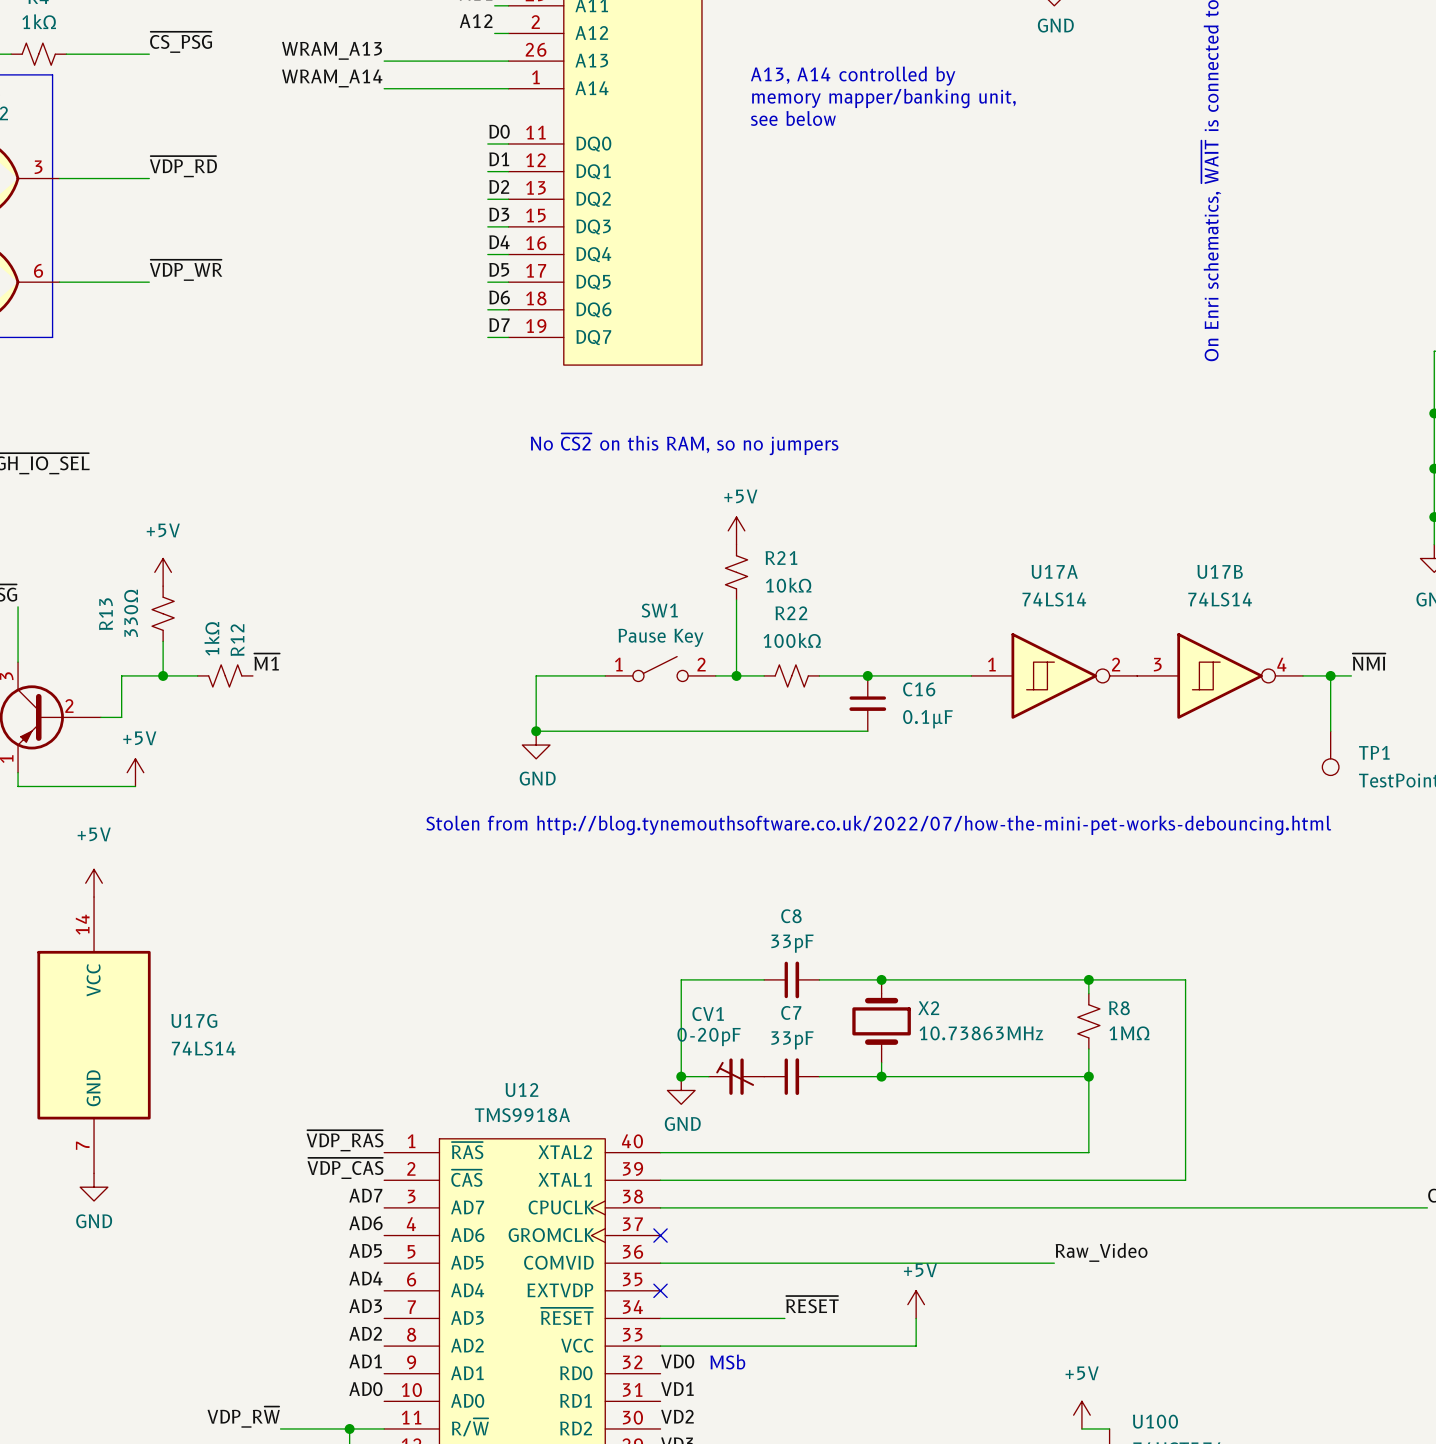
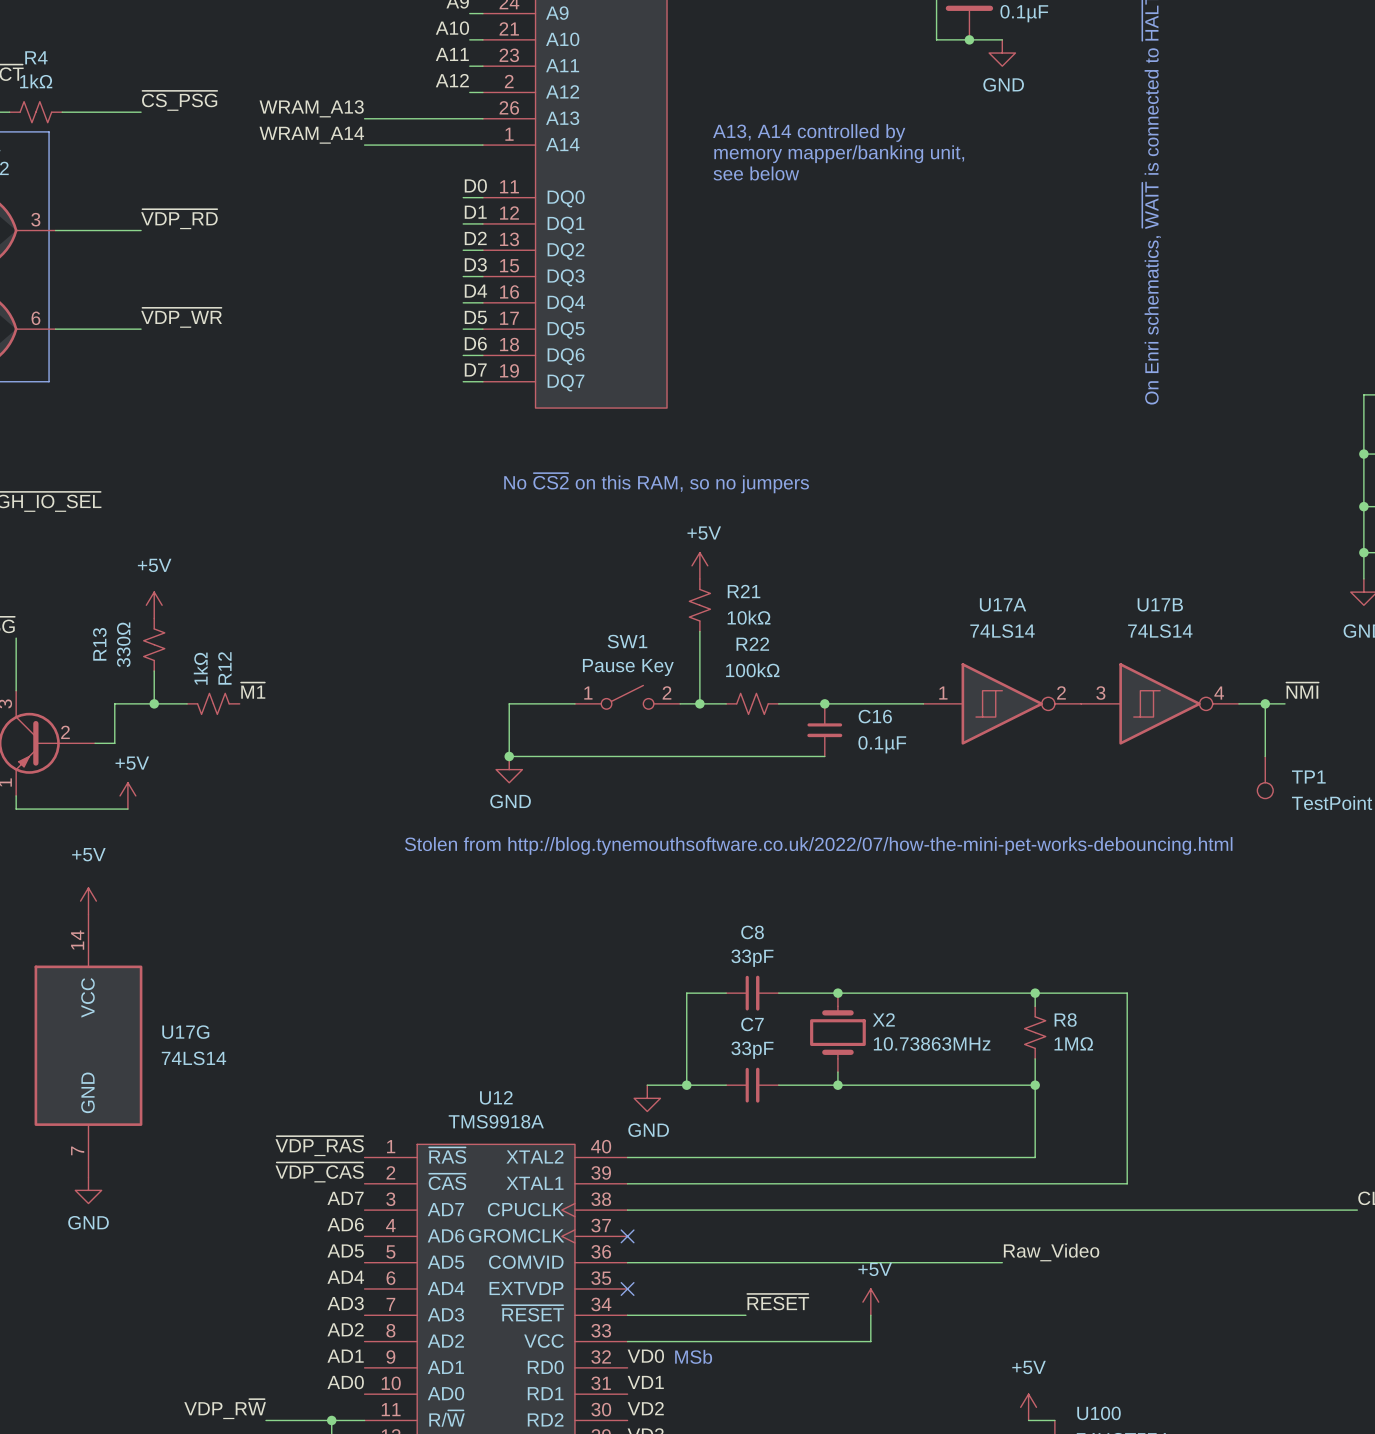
wire: (722, 979) (681, 979) (681, 1076) -> (686, 993) (686, 1085)
junction position: (681, 1076) -> (686, 1085)
CV1: 0-20pF (736, 1076) -> none

